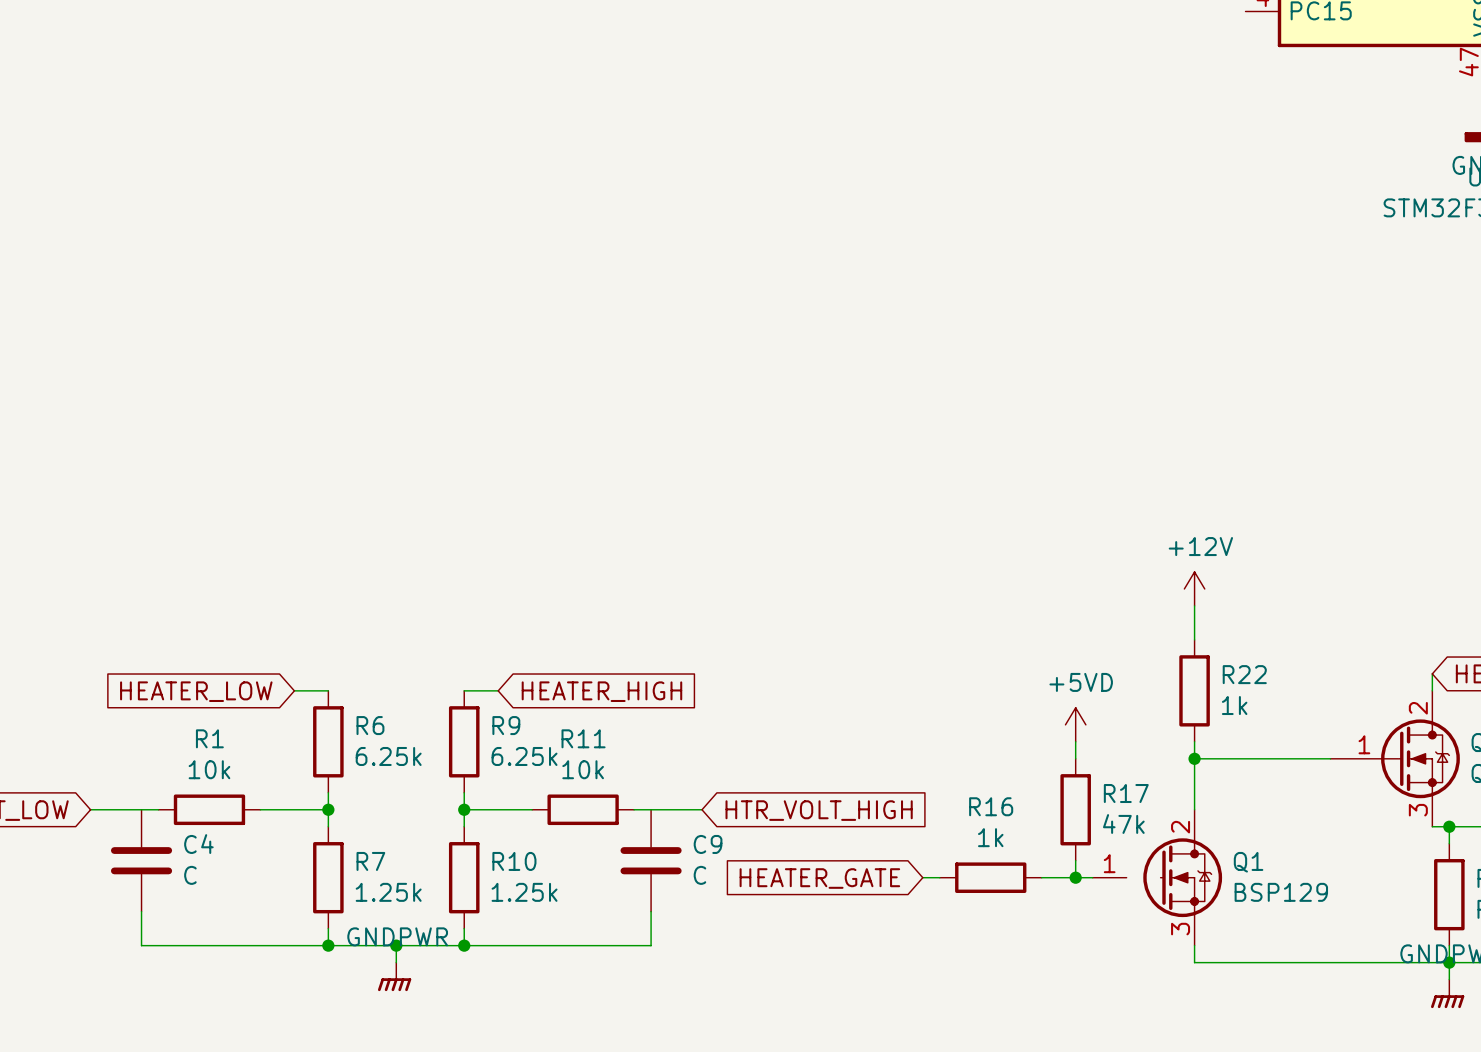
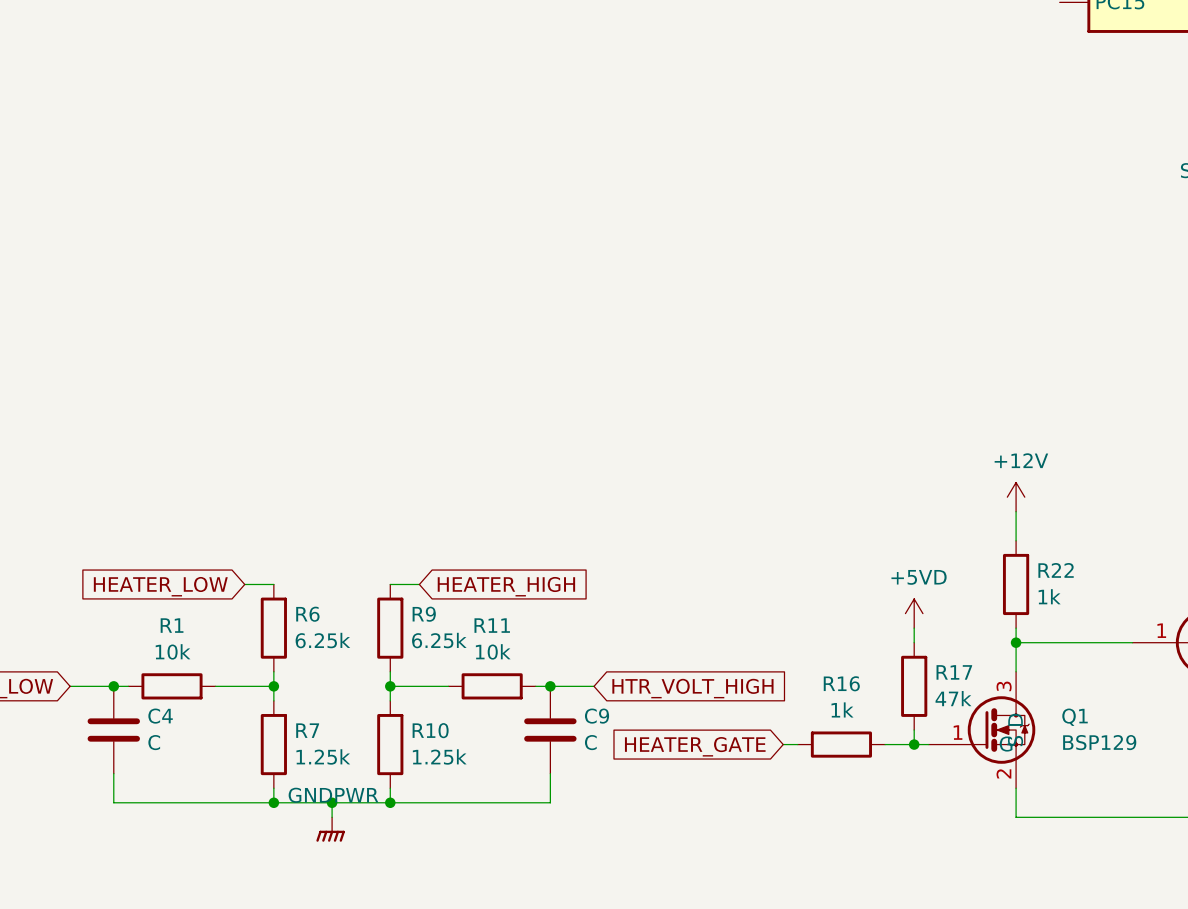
junction: none -> (113, 686)
junction: none -> (550, 686)
Q1 symbol: [1092, 809, 1223, 946] -> [928, 671, 1036, 789]

